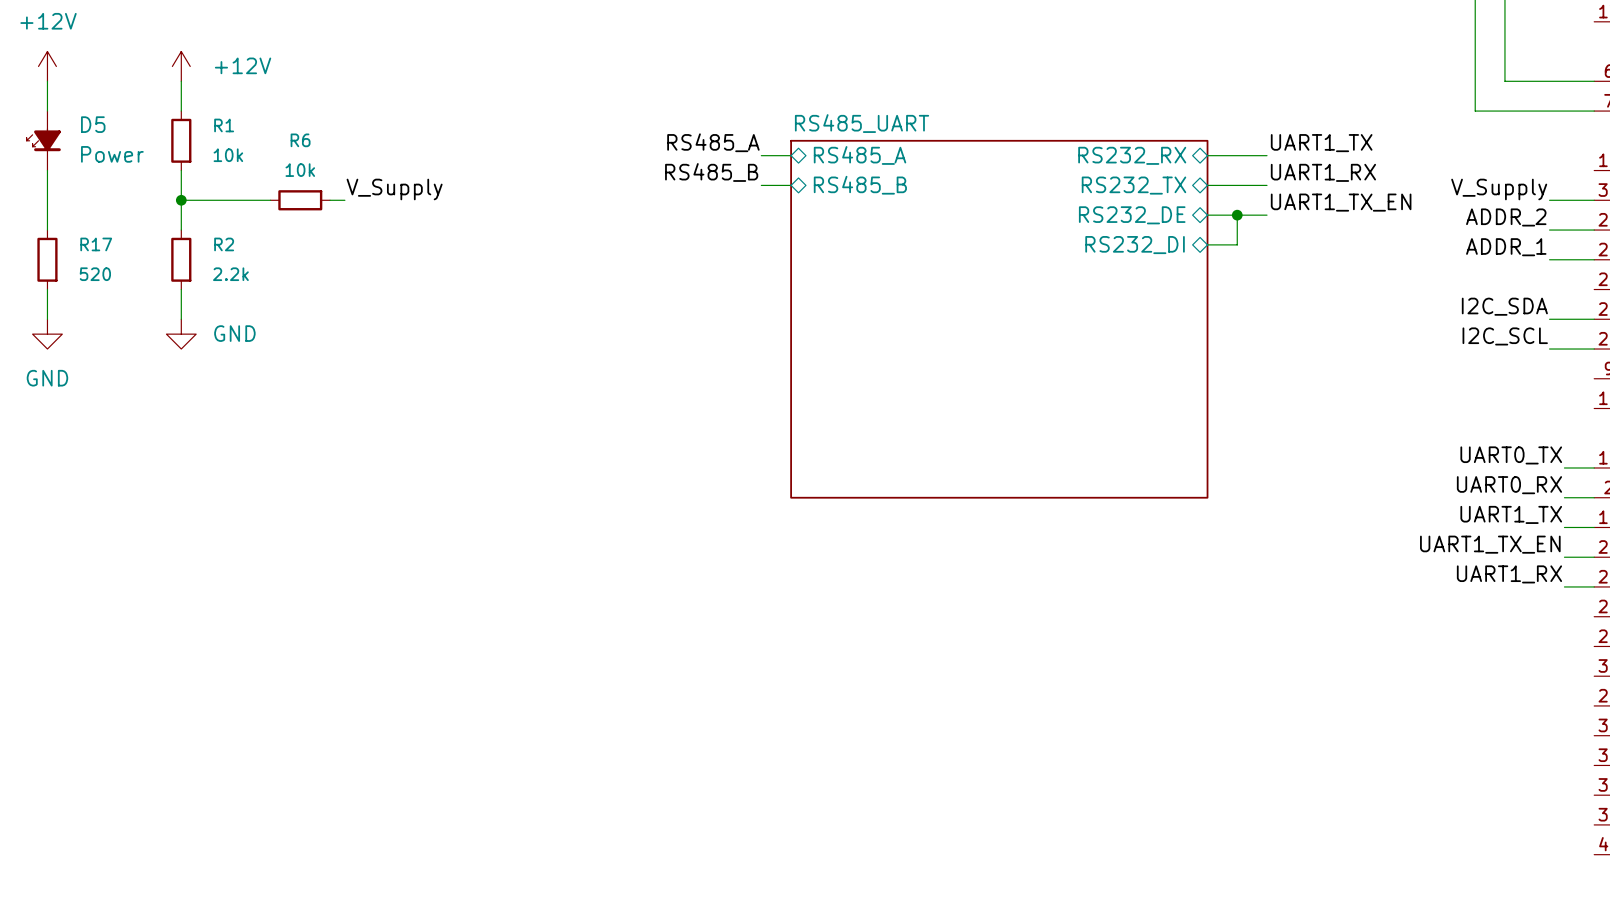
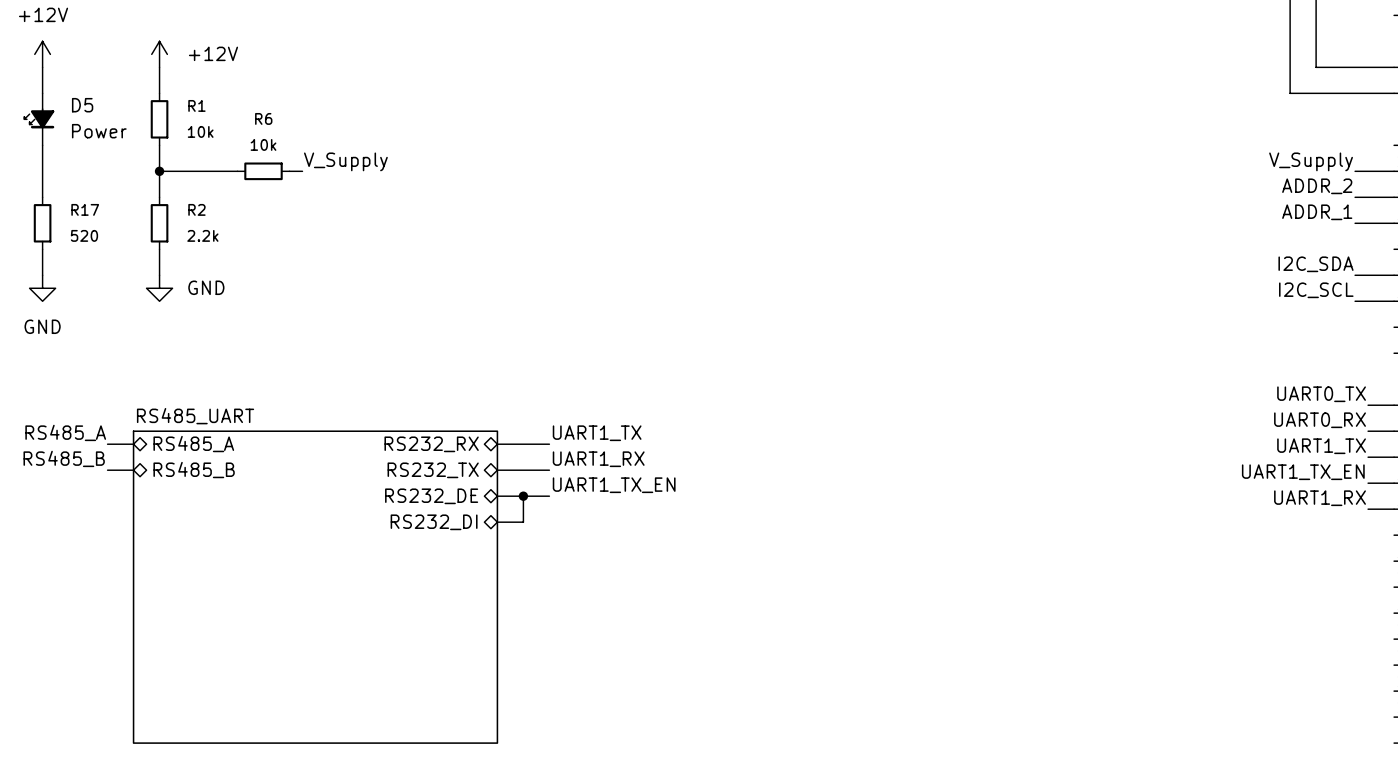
label: RS485_A (713, 142) -> none
label: UART1_TX (1321, 143) -> none
wire: (761, 155) (791, 155) -> none
sheet pin: RS485_A (860, 155) -> none
sheet pin: RS232_RX (1132, 155) -> none
wire: (1207, 155) (1267, 155) -> none
label: RS485_B (711, 172) -> none
label: UART1_RX (1323, 172) -> none
wire: (761, 185) (791, 185) -> none
sheet pin: RS485_B (860, 185) -> none
sheet pin: RS232_TX (1133, 185) -> none
wire: (1207, 185) (1267, 185) -> none
label: UART1_TX_EN (1341, 202) -> none
sheet pin: RS232_DE (1132, 215) -> none
wire: (1207, 215) (1267, 215) -> none
wire: (1237, 215) (1237, 244) (1207, 244) -> none
junction: (1237, 215) -> none
sheet pin: RS232_DI (1135, 245) -> none
sheet RS485_UART position: (999, 319) -> (315, 587)
label: none -> RS485_A (65, 432)
label: none -> UART1_TX (597, 433)
wire: none -> (107, 444) (133, 444)
sheet pin: none -> RS485_A (193, 444)
sheet pin: none -> RS232_RX (431, 444)
wire: none -> (497, 444) (549, 444)
label: none -> RS485_B (64, 458)
label: none -> UART1_RX (598, 459)
wire: none -> (107, 470) (133, 470)
sheet pin: none -> RS485_B (194, 470)
sheet pin: none -> RS232_TX (433, 470)
wire: none -> (497, 470) (549, 470)
label: none -> UART1_TX_EN (614, 485)
sheet pin: none -> RS232_DE (431, 496)
wire: none -> (497, 496) (549, 496)
wire: none -> (523, 496) (523, 522) (497, 522)
junction: none -> (523, 496)
sheet pin: none -> RS232_DI (434, 522)

